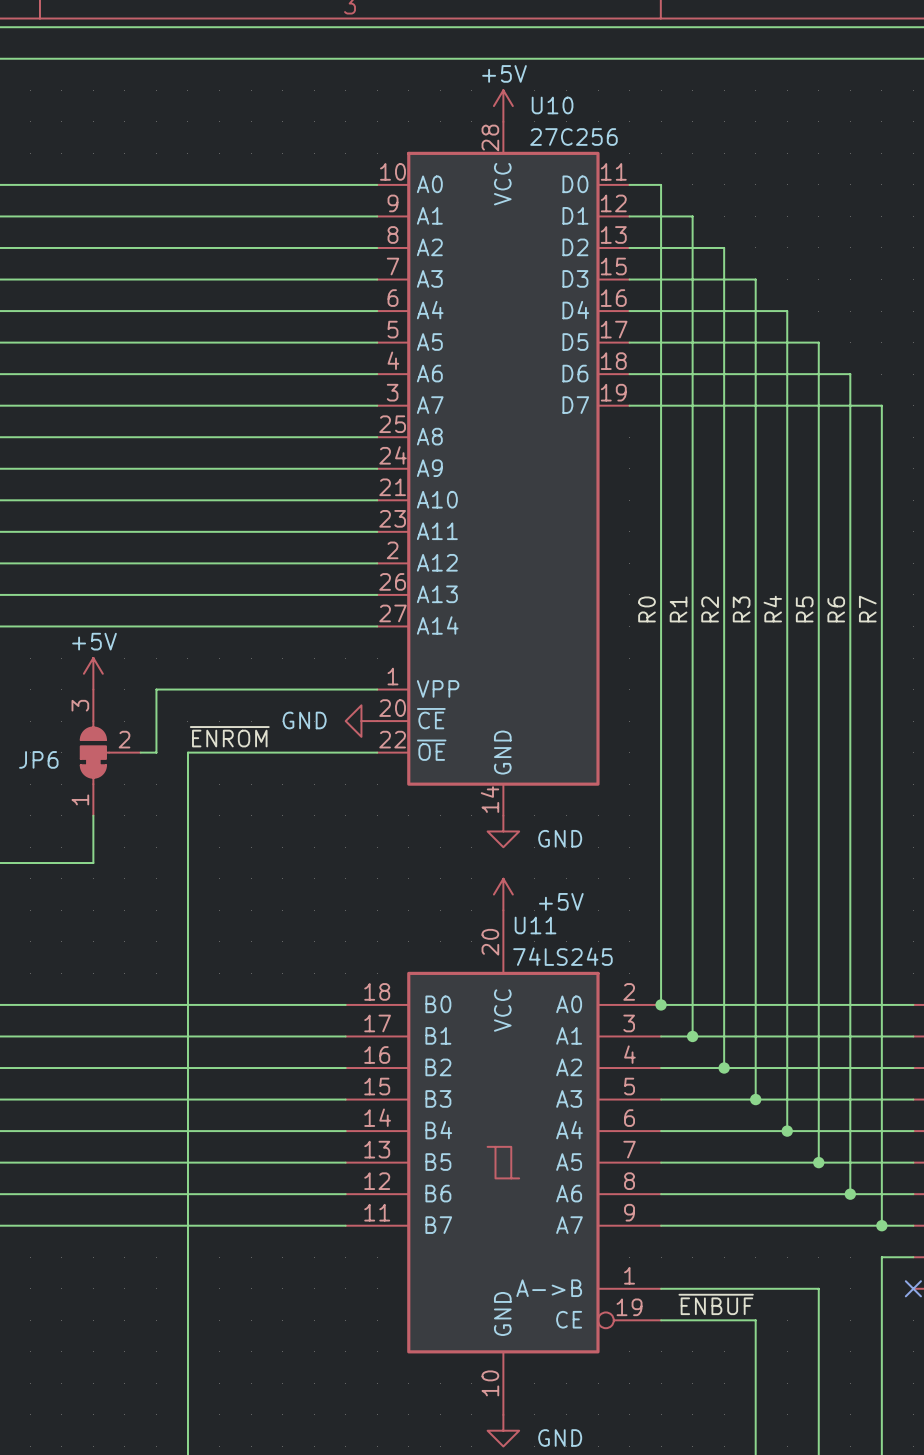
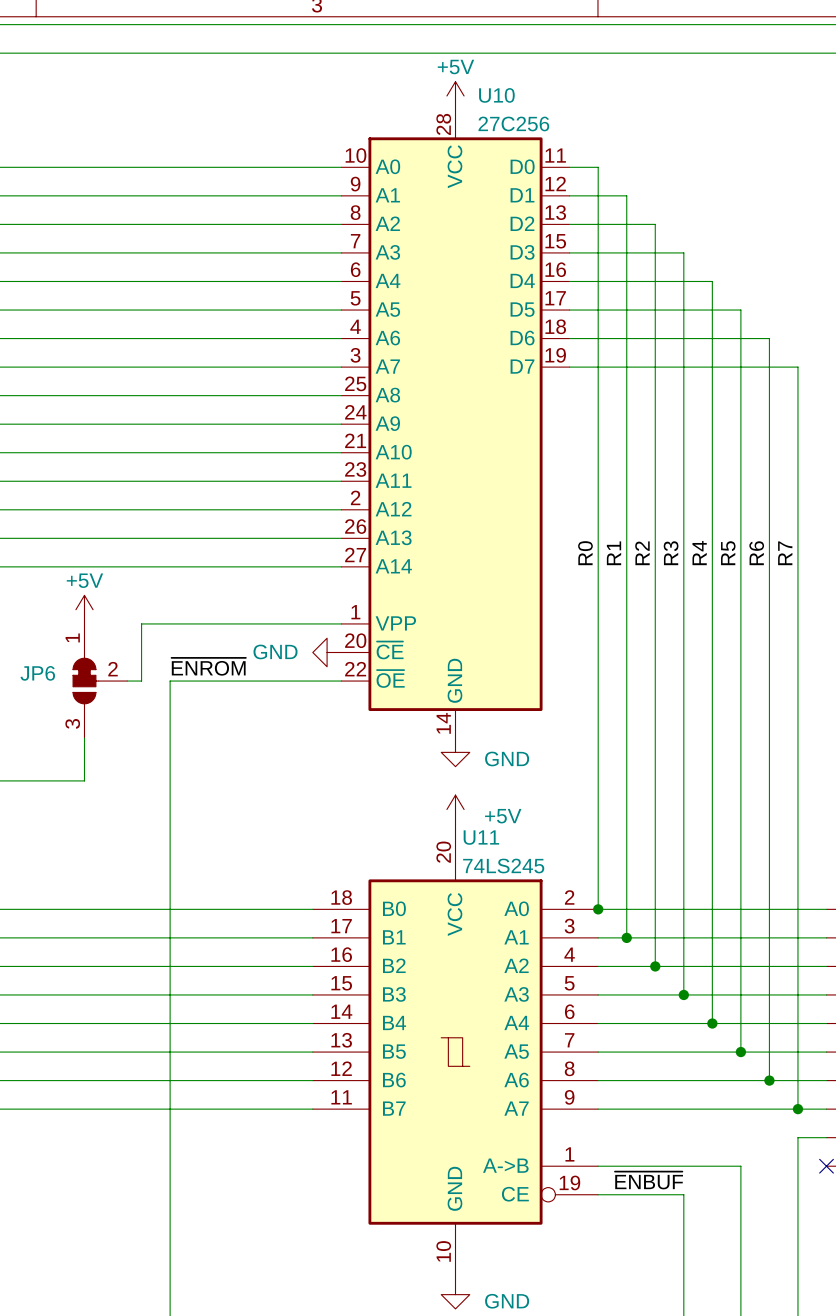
JP6 flip: as is (94, 752) -> up-down (85, 681)

